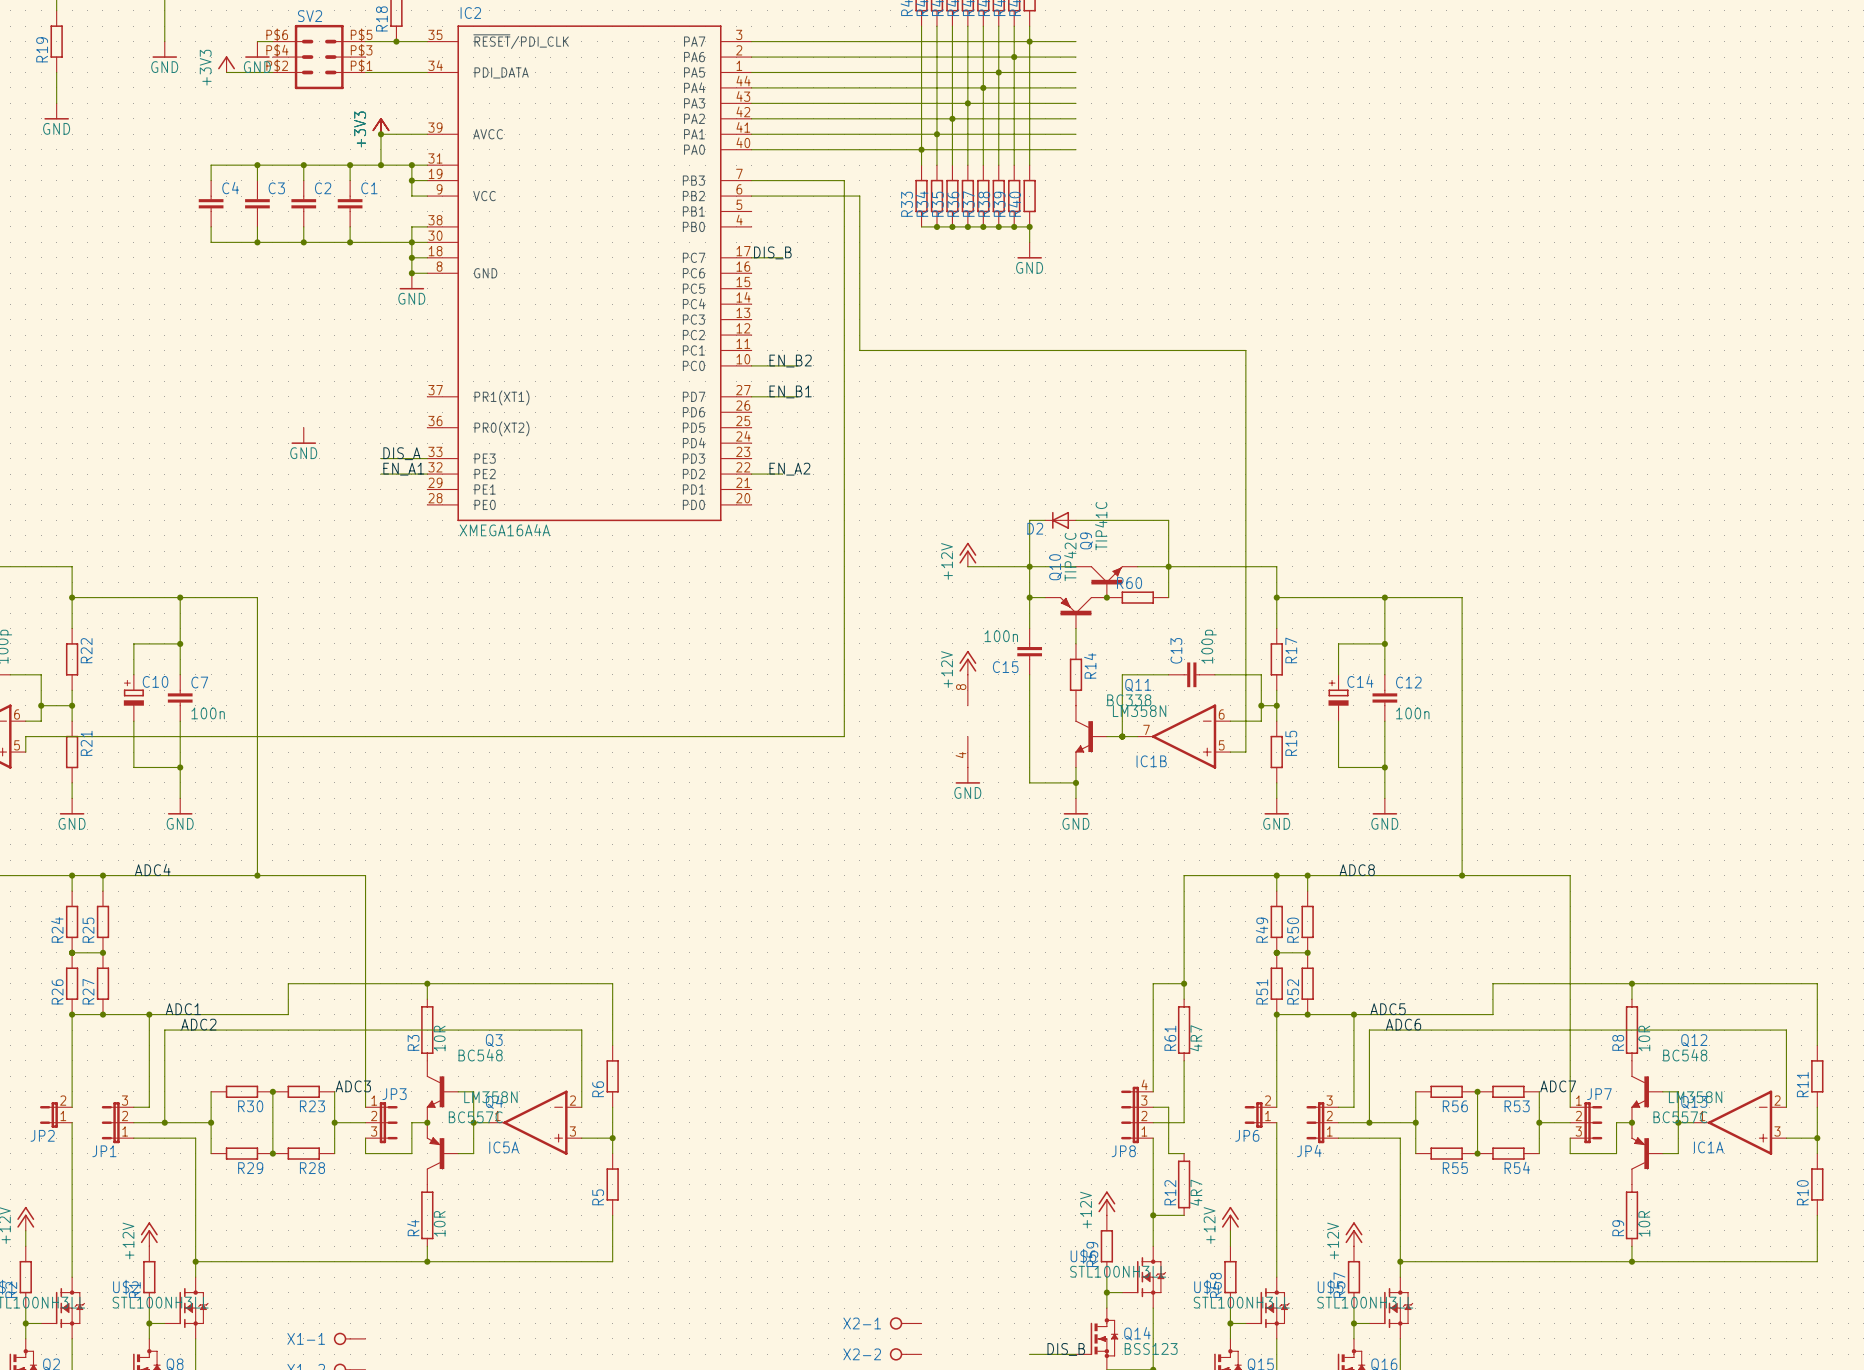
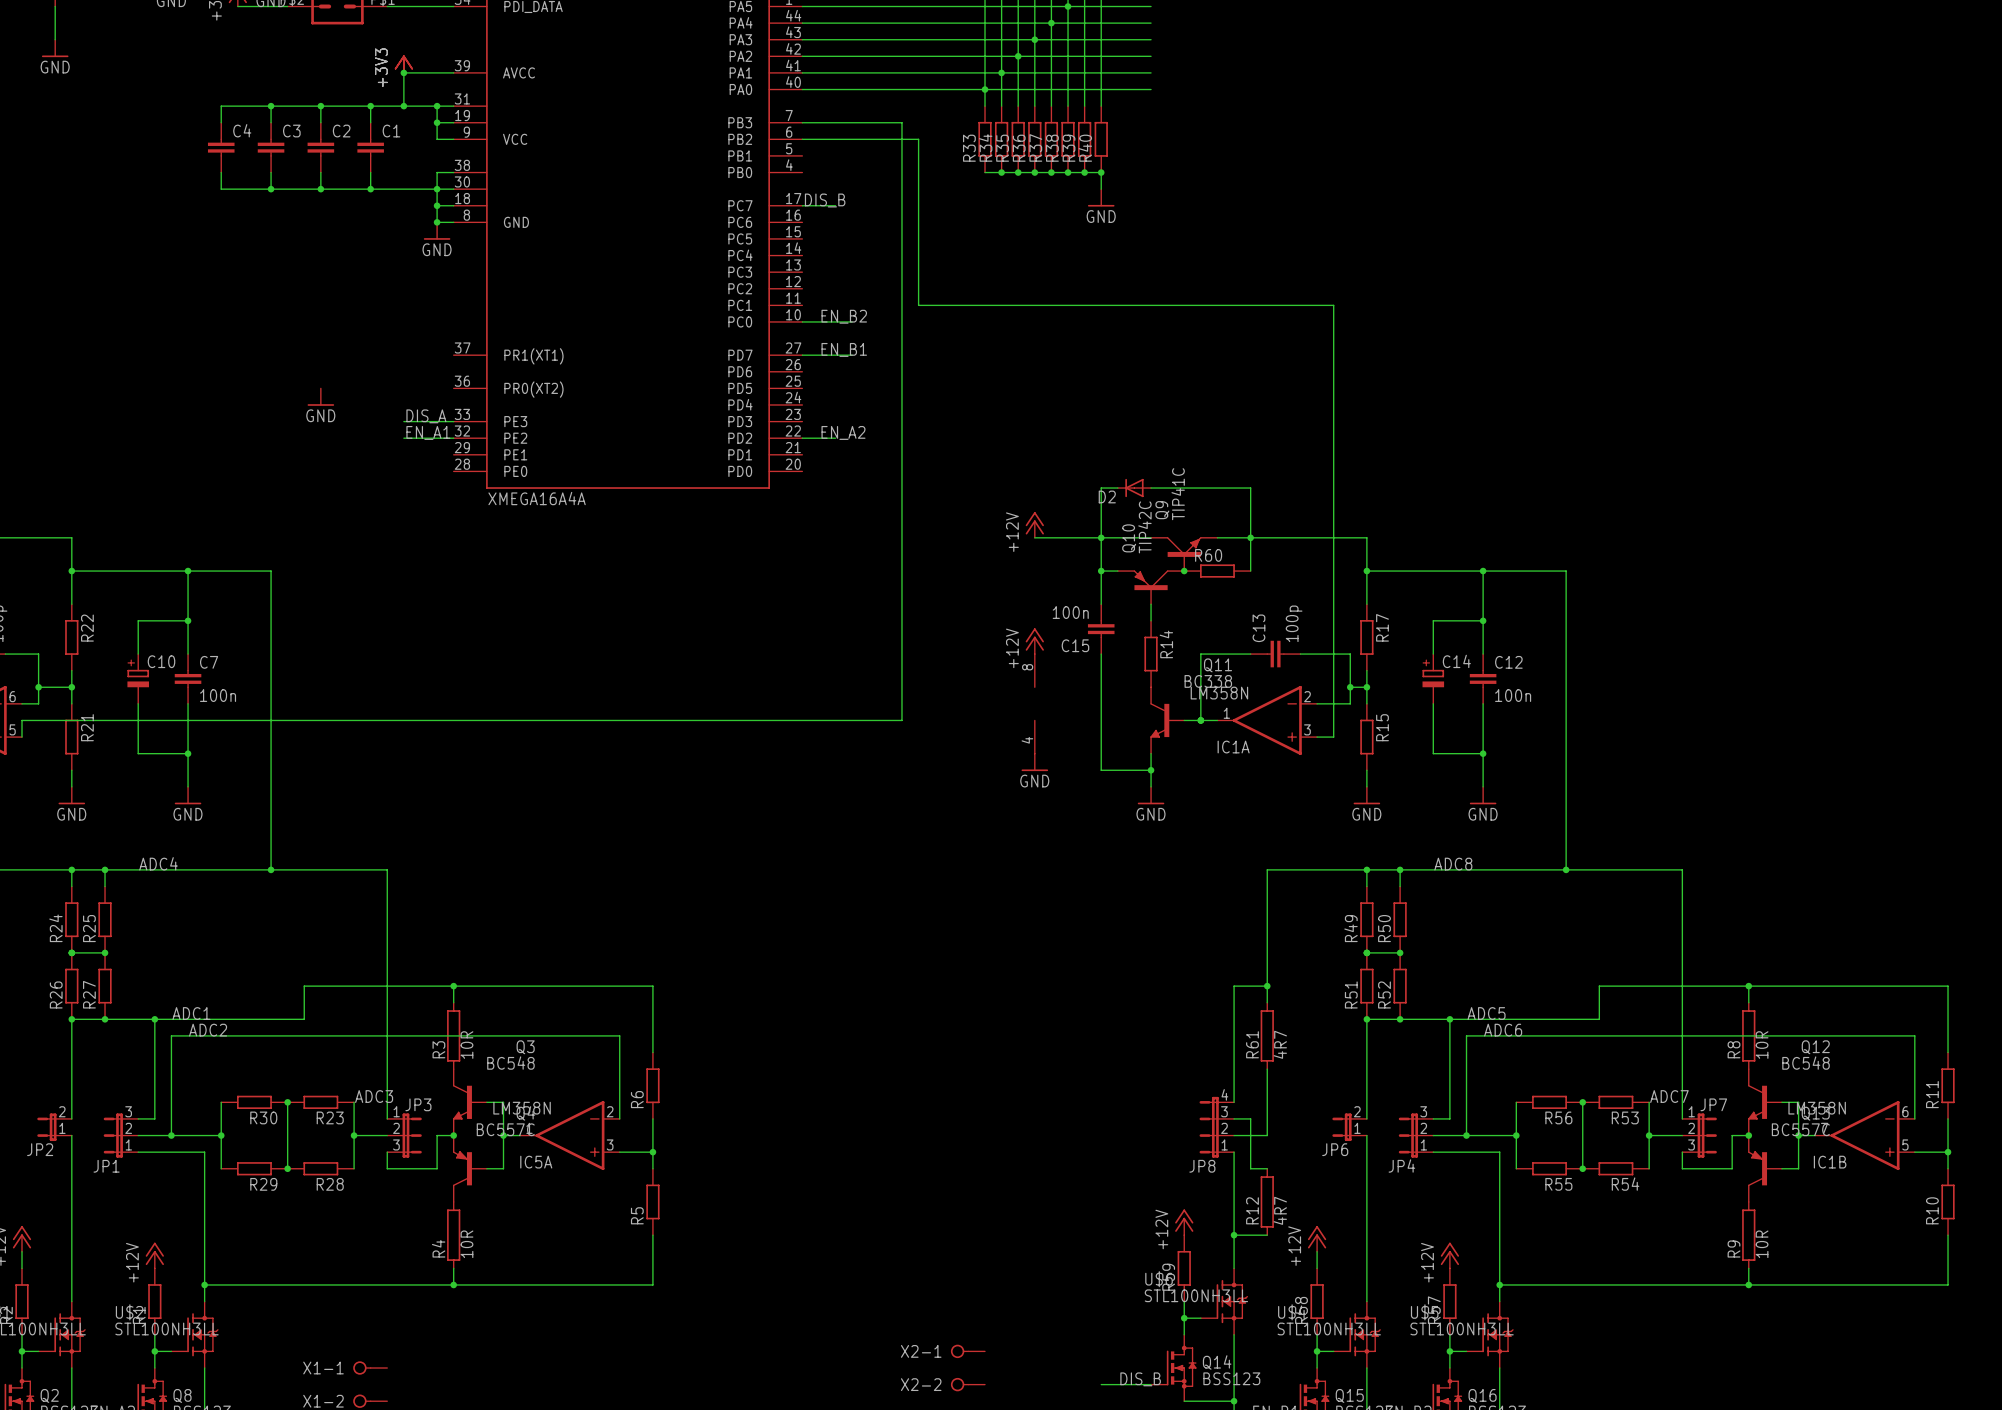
IC1B position: (1184, 736) -> (1864, 1135)
IC1A position: (1740, 1122) -> (1267, 720)

